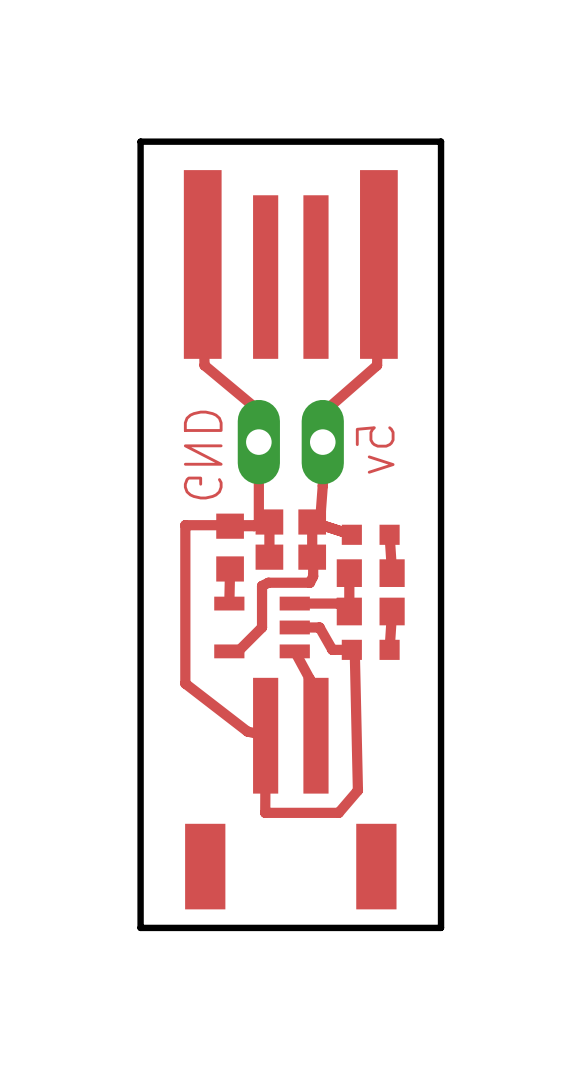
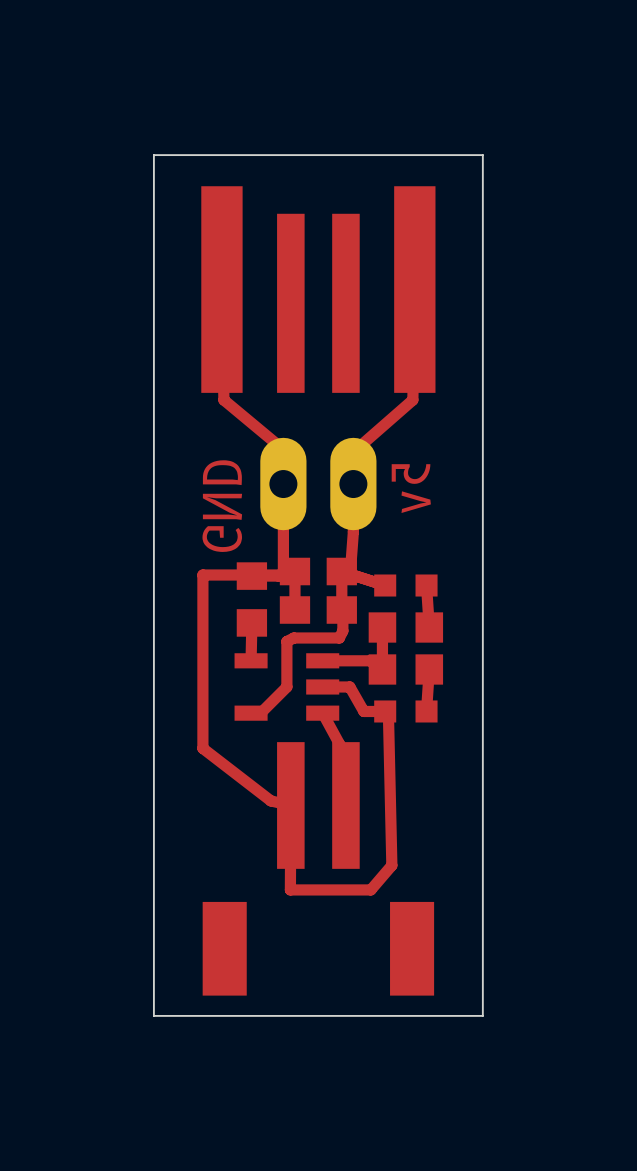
board edge width: thick (441, 141) (140, 141) (140, 927) (441, 927) (441, 141) -> thin (482, 155) (153, 155) (153, 1015) (482, 1015) (482, 155)

